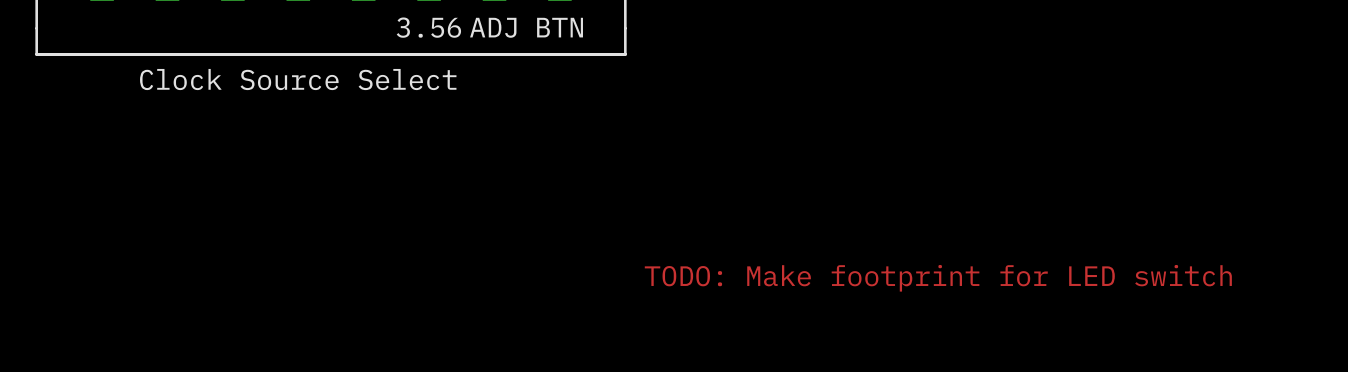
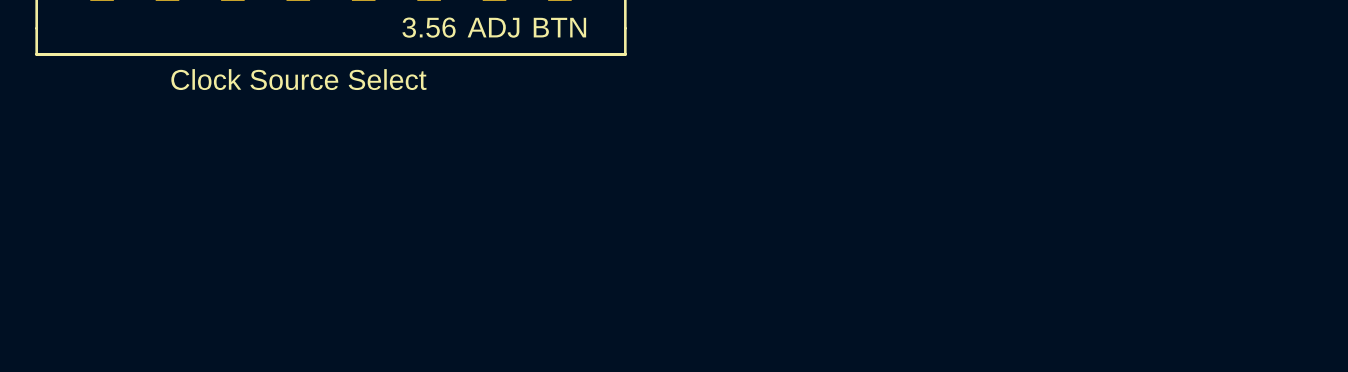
text: TODO: Make footprint for LED switch (938, 278) -> none

